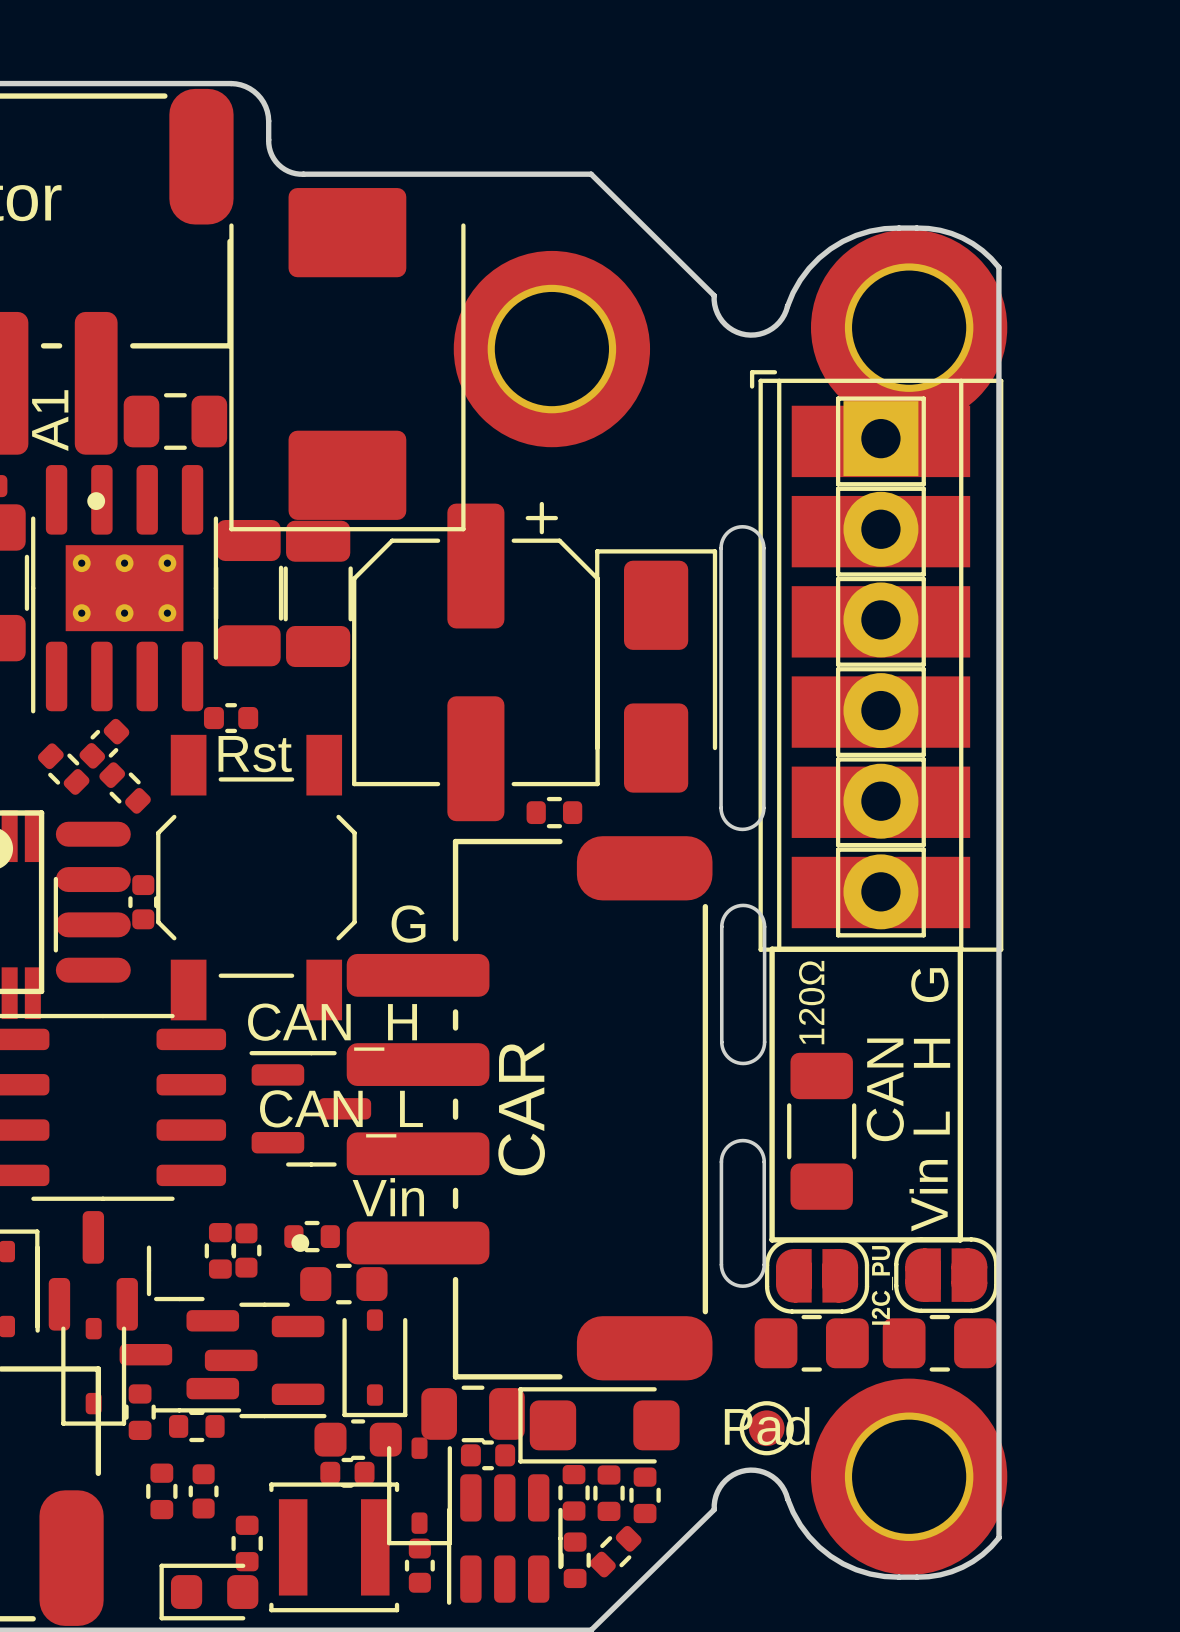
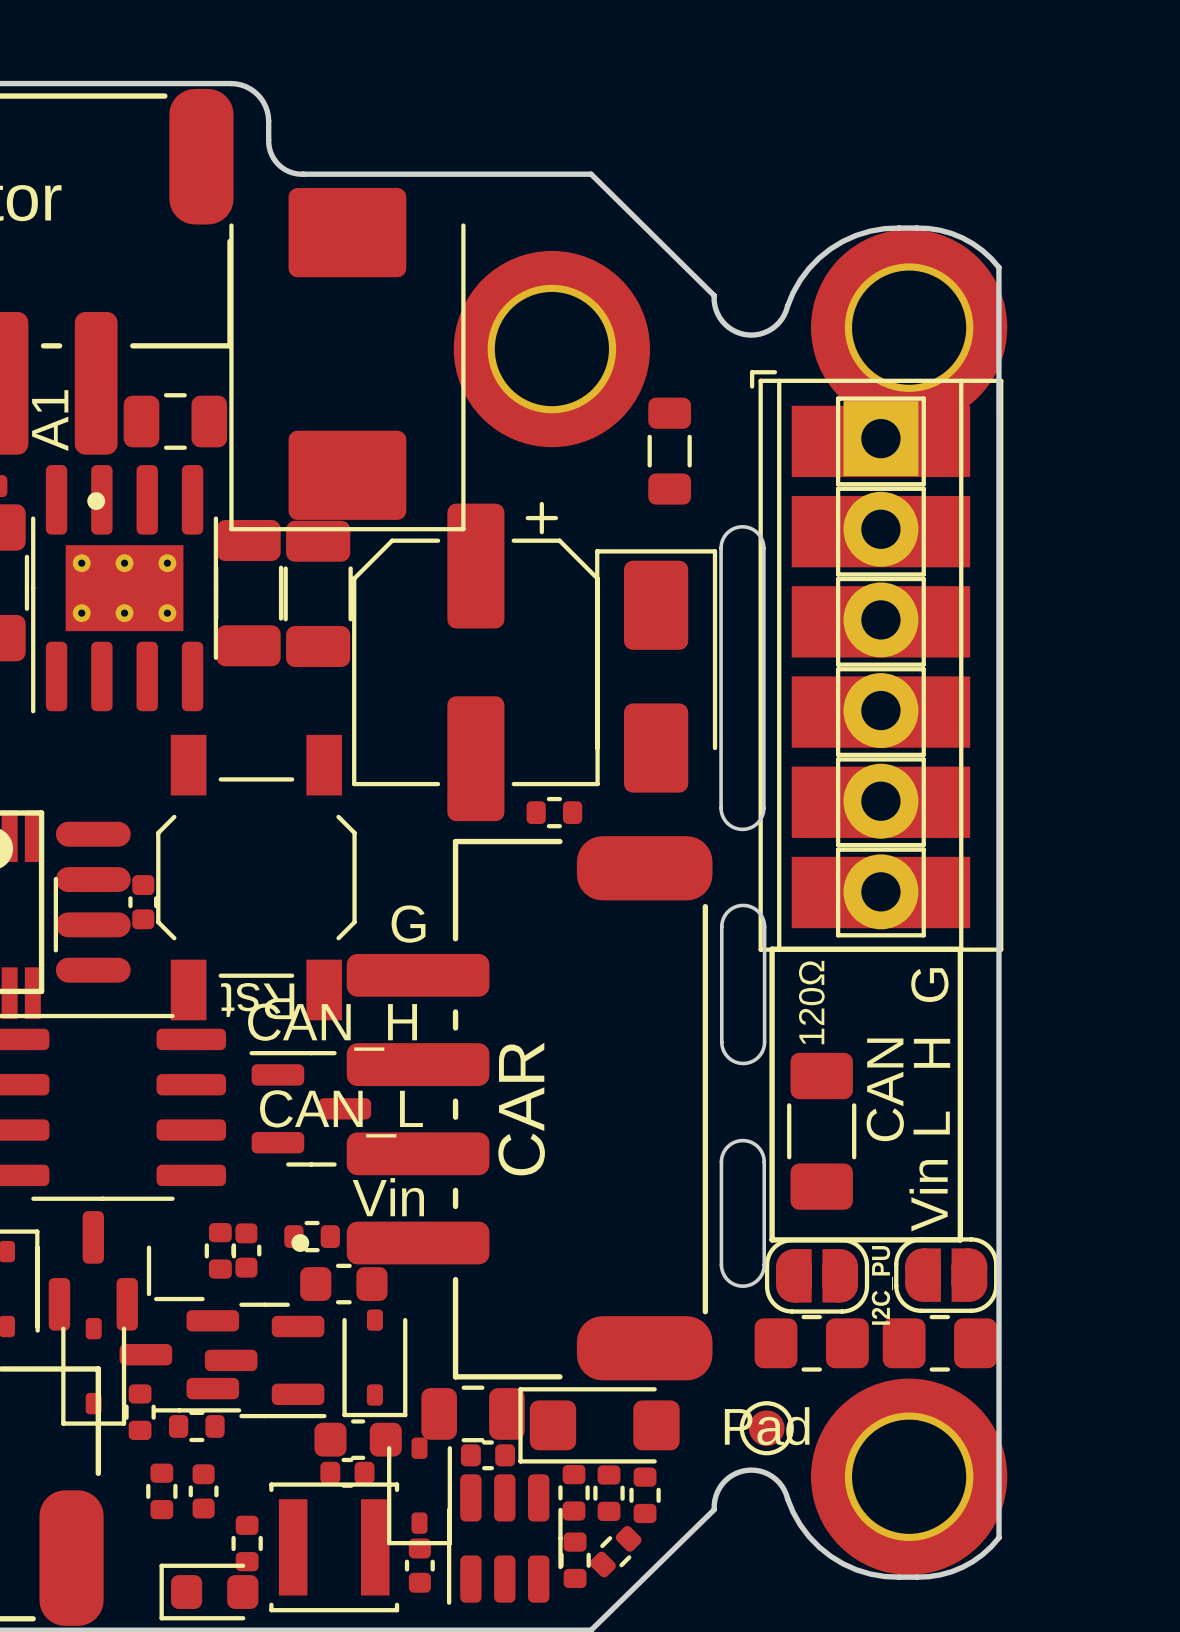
part: none -> (669, 451)
part: (231, 718) -> none
part: (104, 743) -> none
part value rotation: 0° (255, 754) -> 180° (257, 1001)
part value position: Rst (255, 754) -> Rst (257, 1001)
part: (63, 769) -> none
part: (125, 788) -> none

